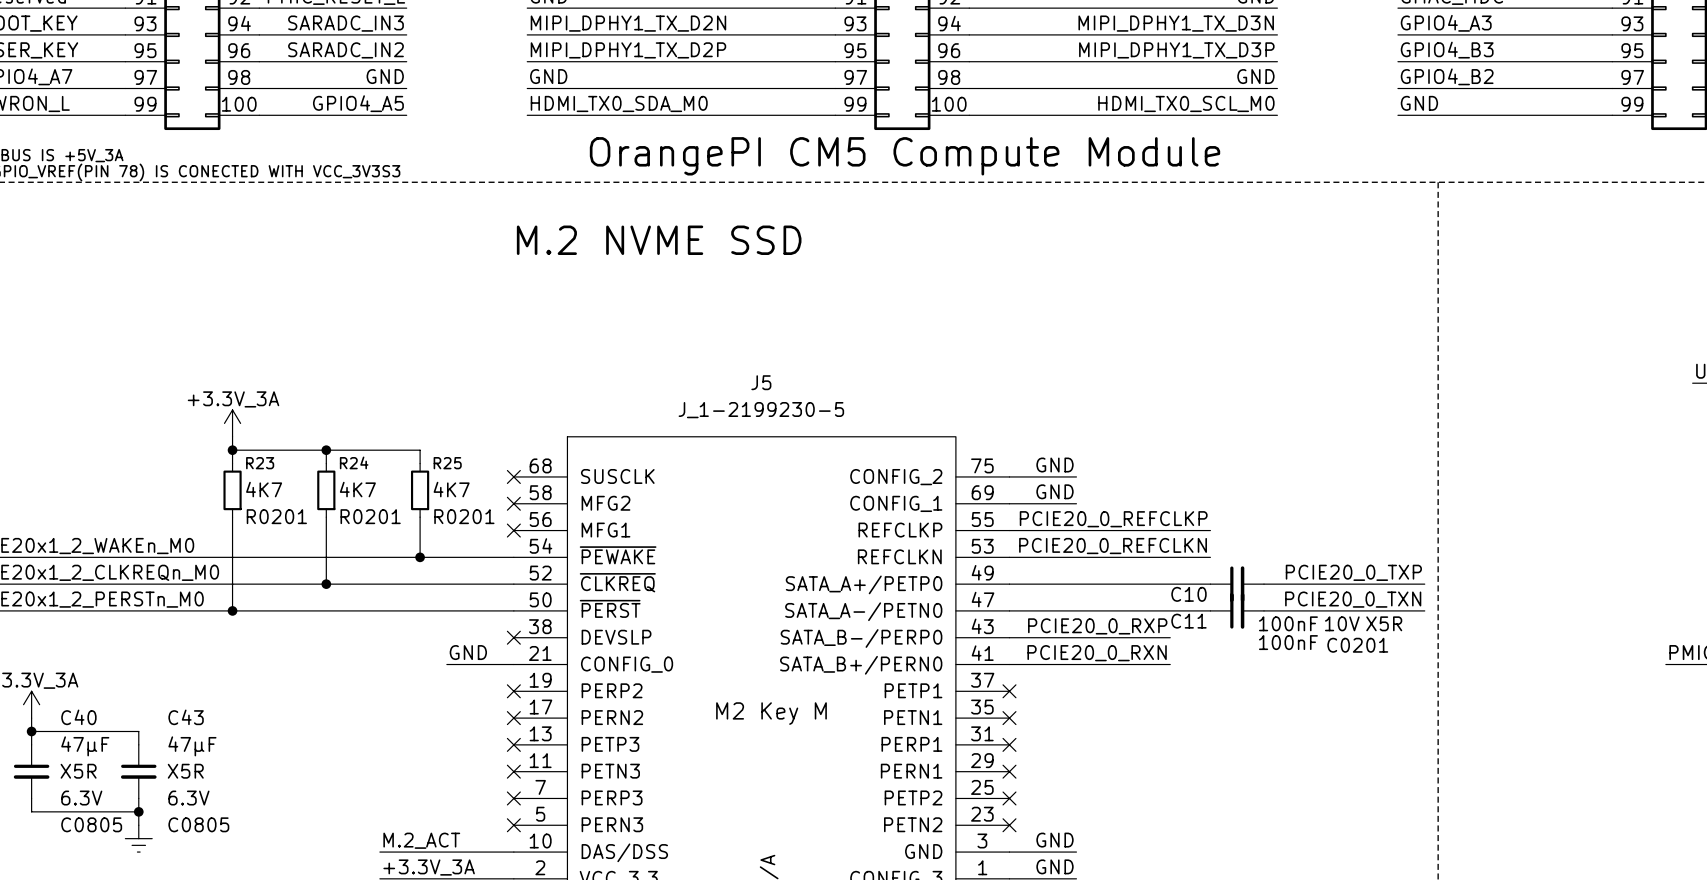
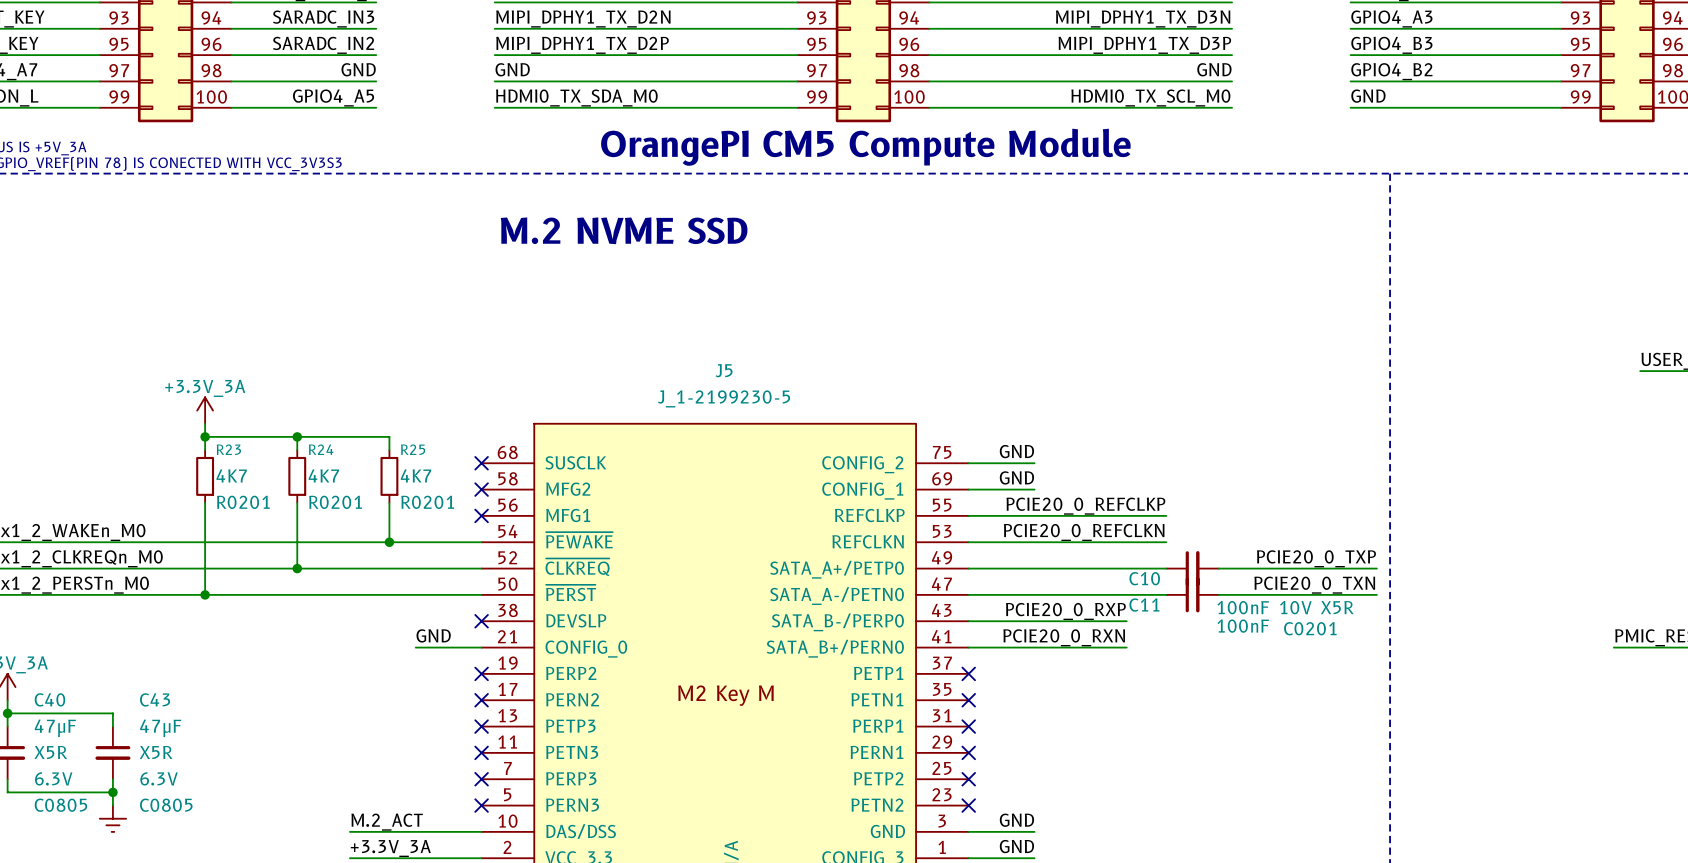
label: HDMI_TX0_SDA_M0 (619, 103) -> HDMI0_TX_SDA_M0 (576, 97)
label: HDMI_TX0_SCL_M0 (1186, 103) -> HDMI0_TX_SCL_M0 (1150, 97)

